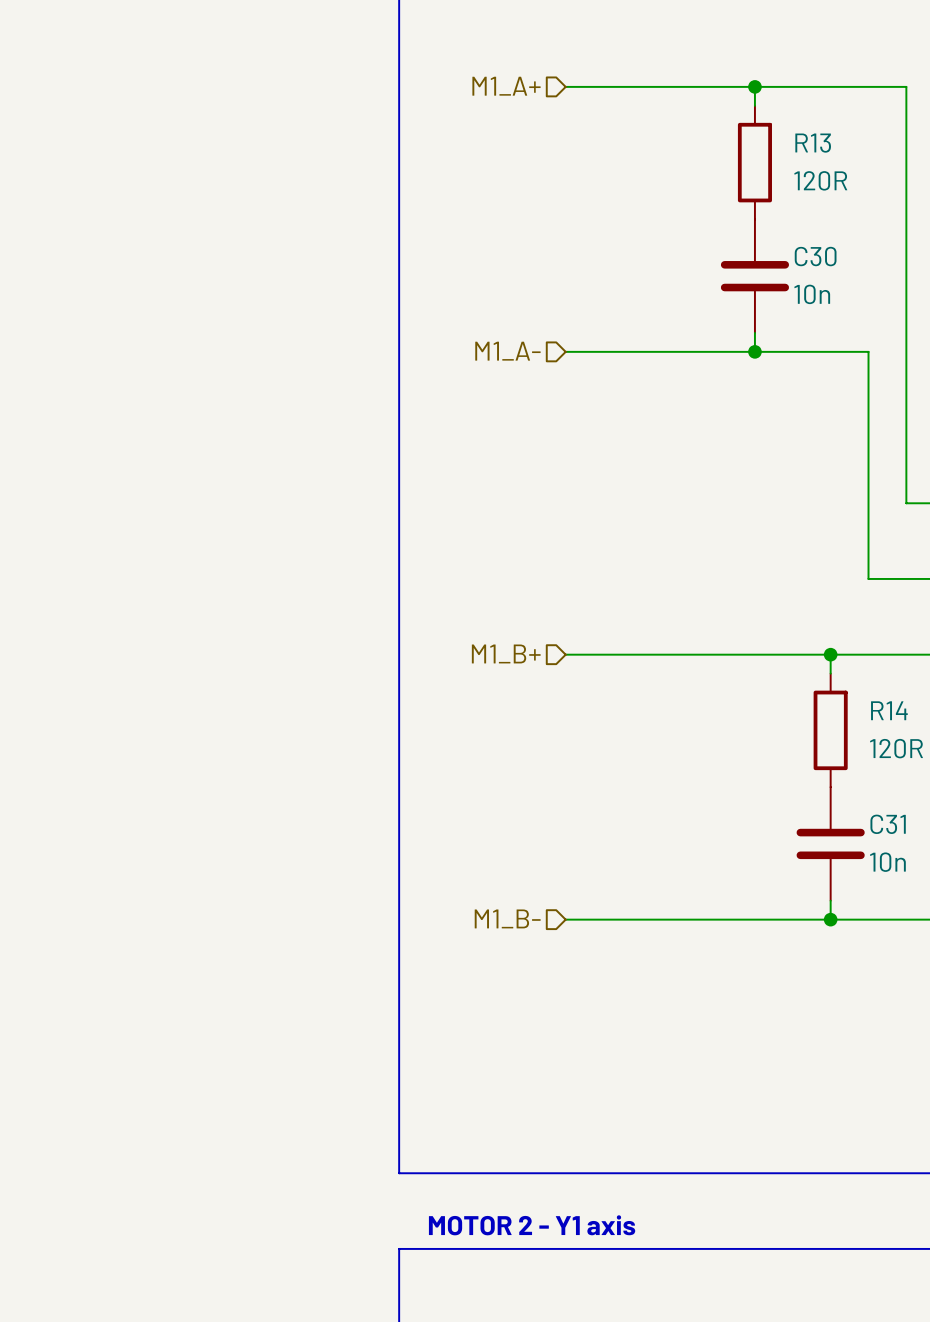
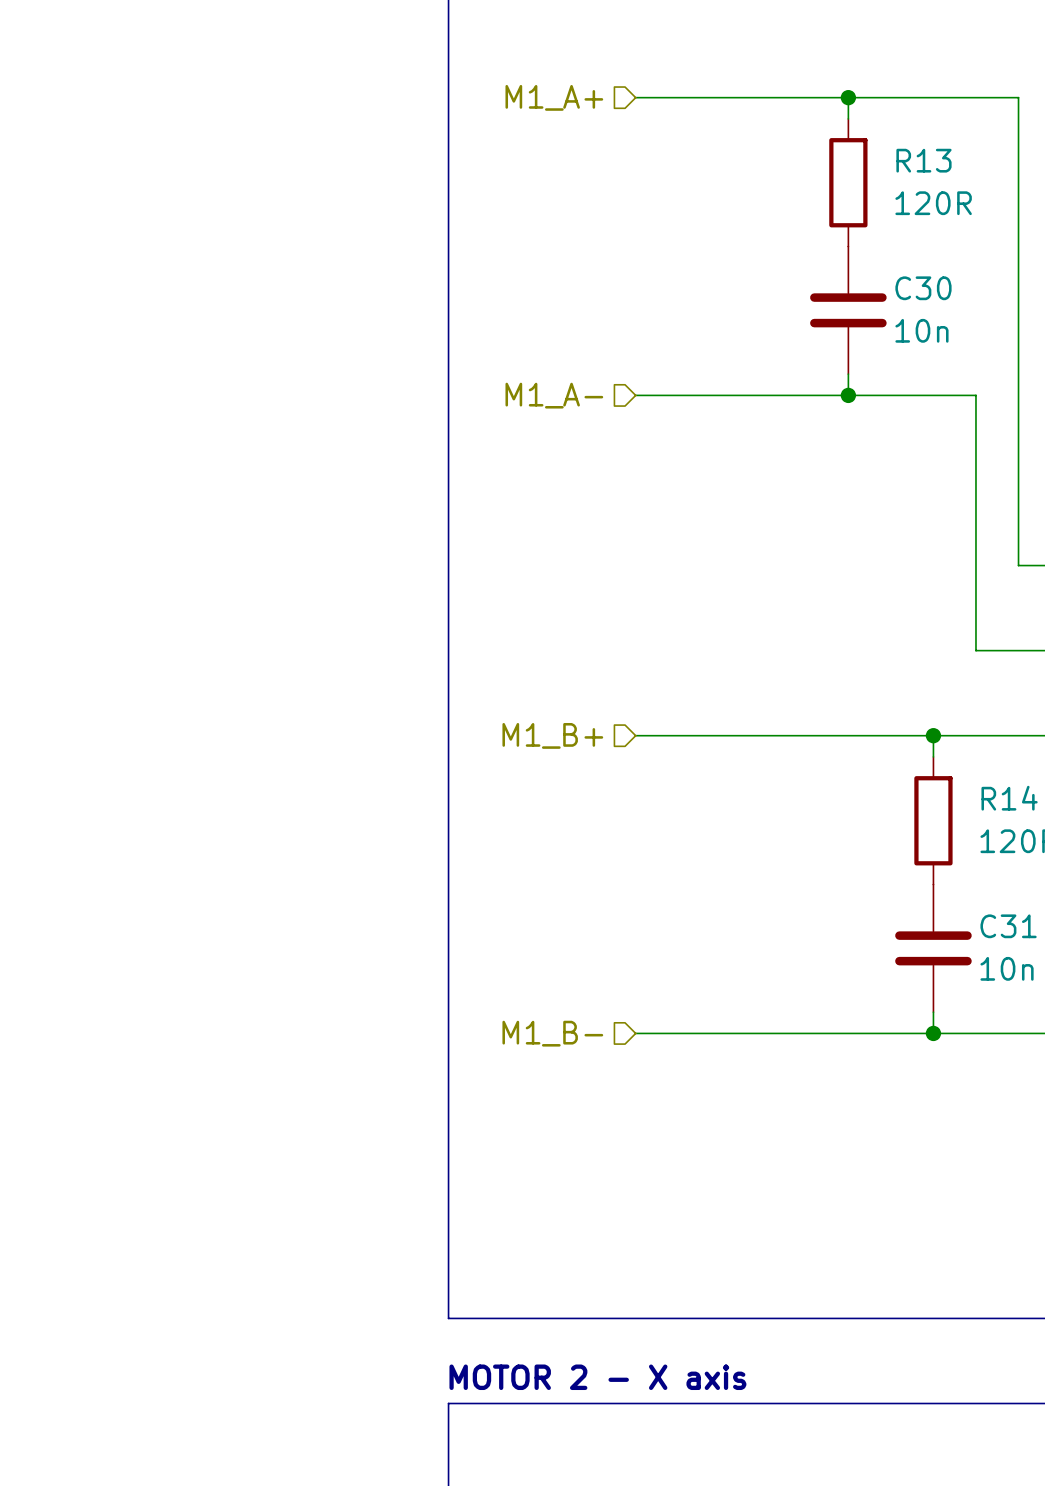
text: MOTOR 2 - Y1 axis (532, 1225) -> MOTOR 2 - X axis (597, 1377)

